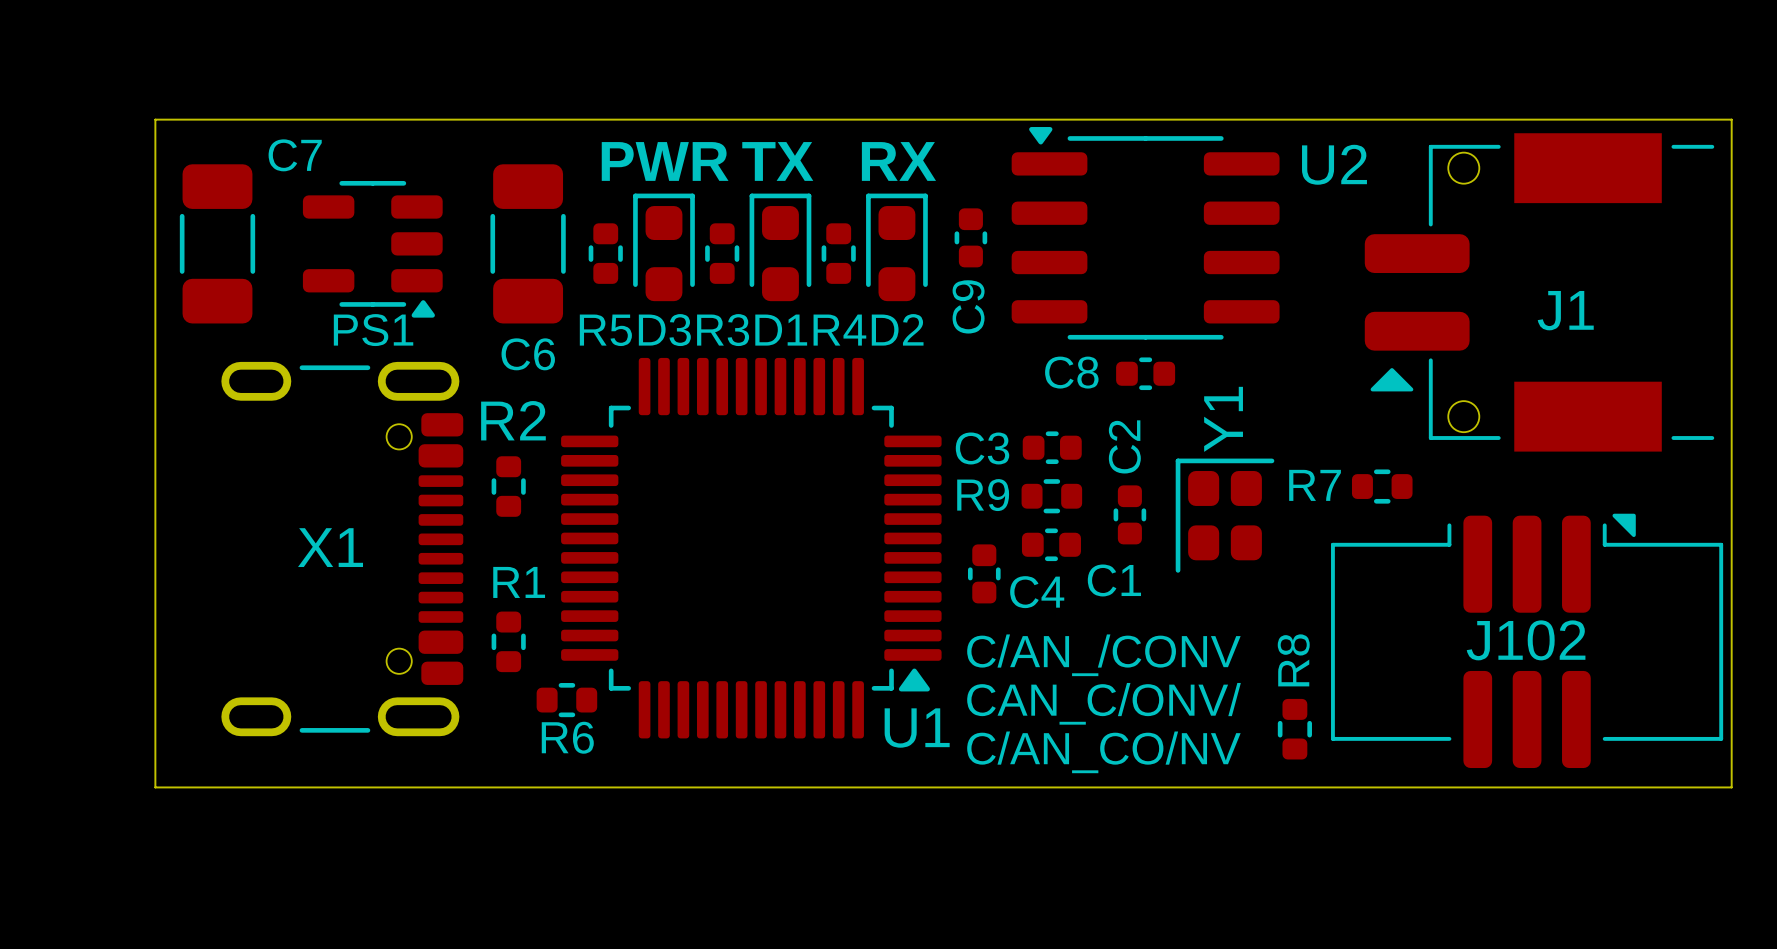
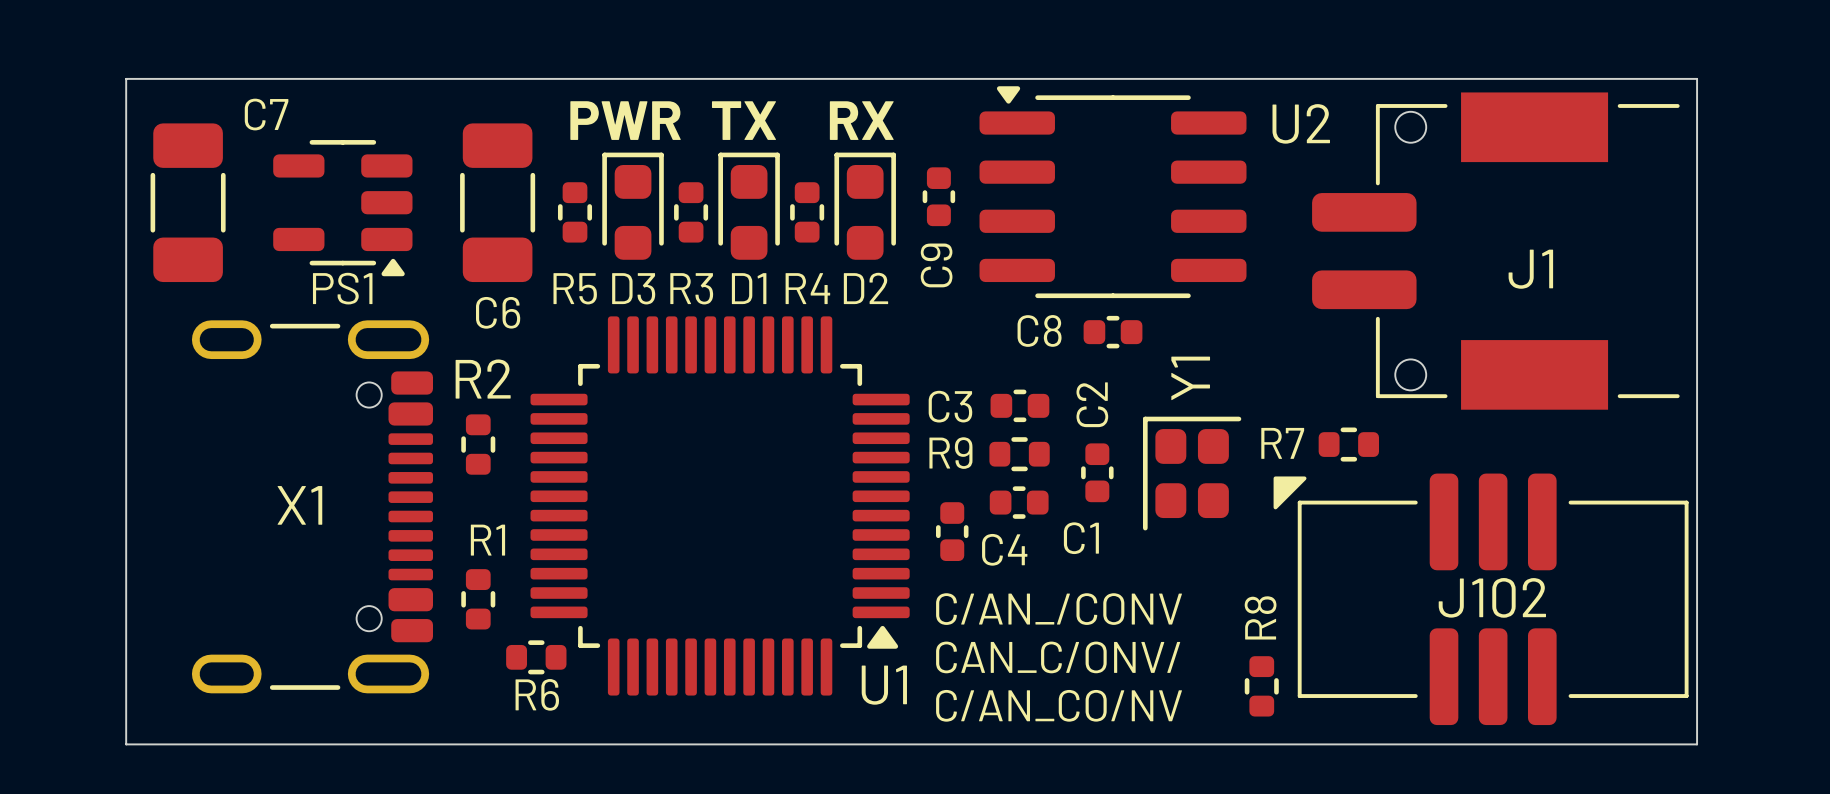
J1 footprint: [1364, 133, 1715, 452] -> [1312, 92, 1680, 410]
J102 footprint: [1331, 513, 1724, 769] -> [1273, 473, 1689, 726]

